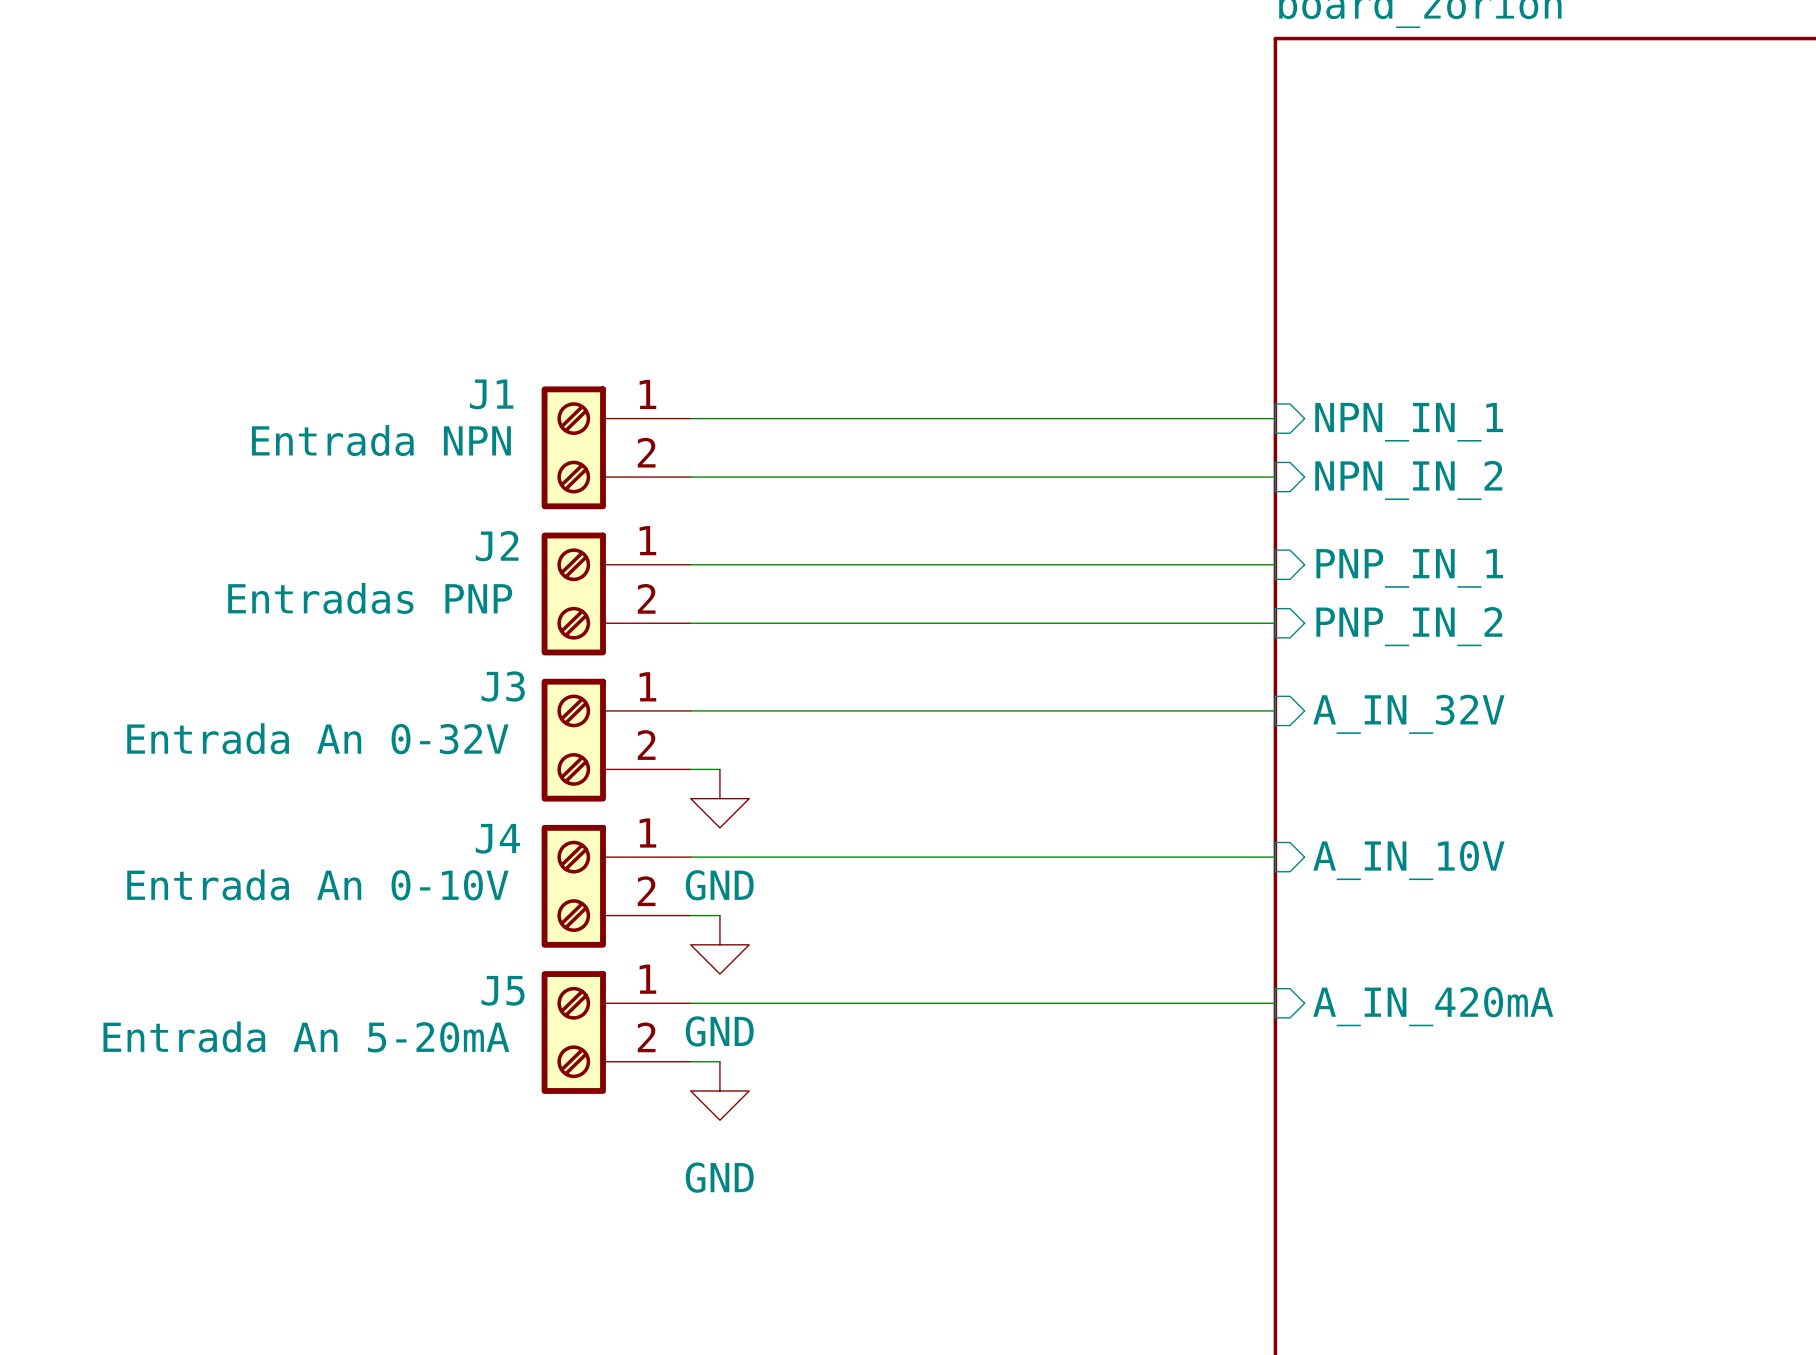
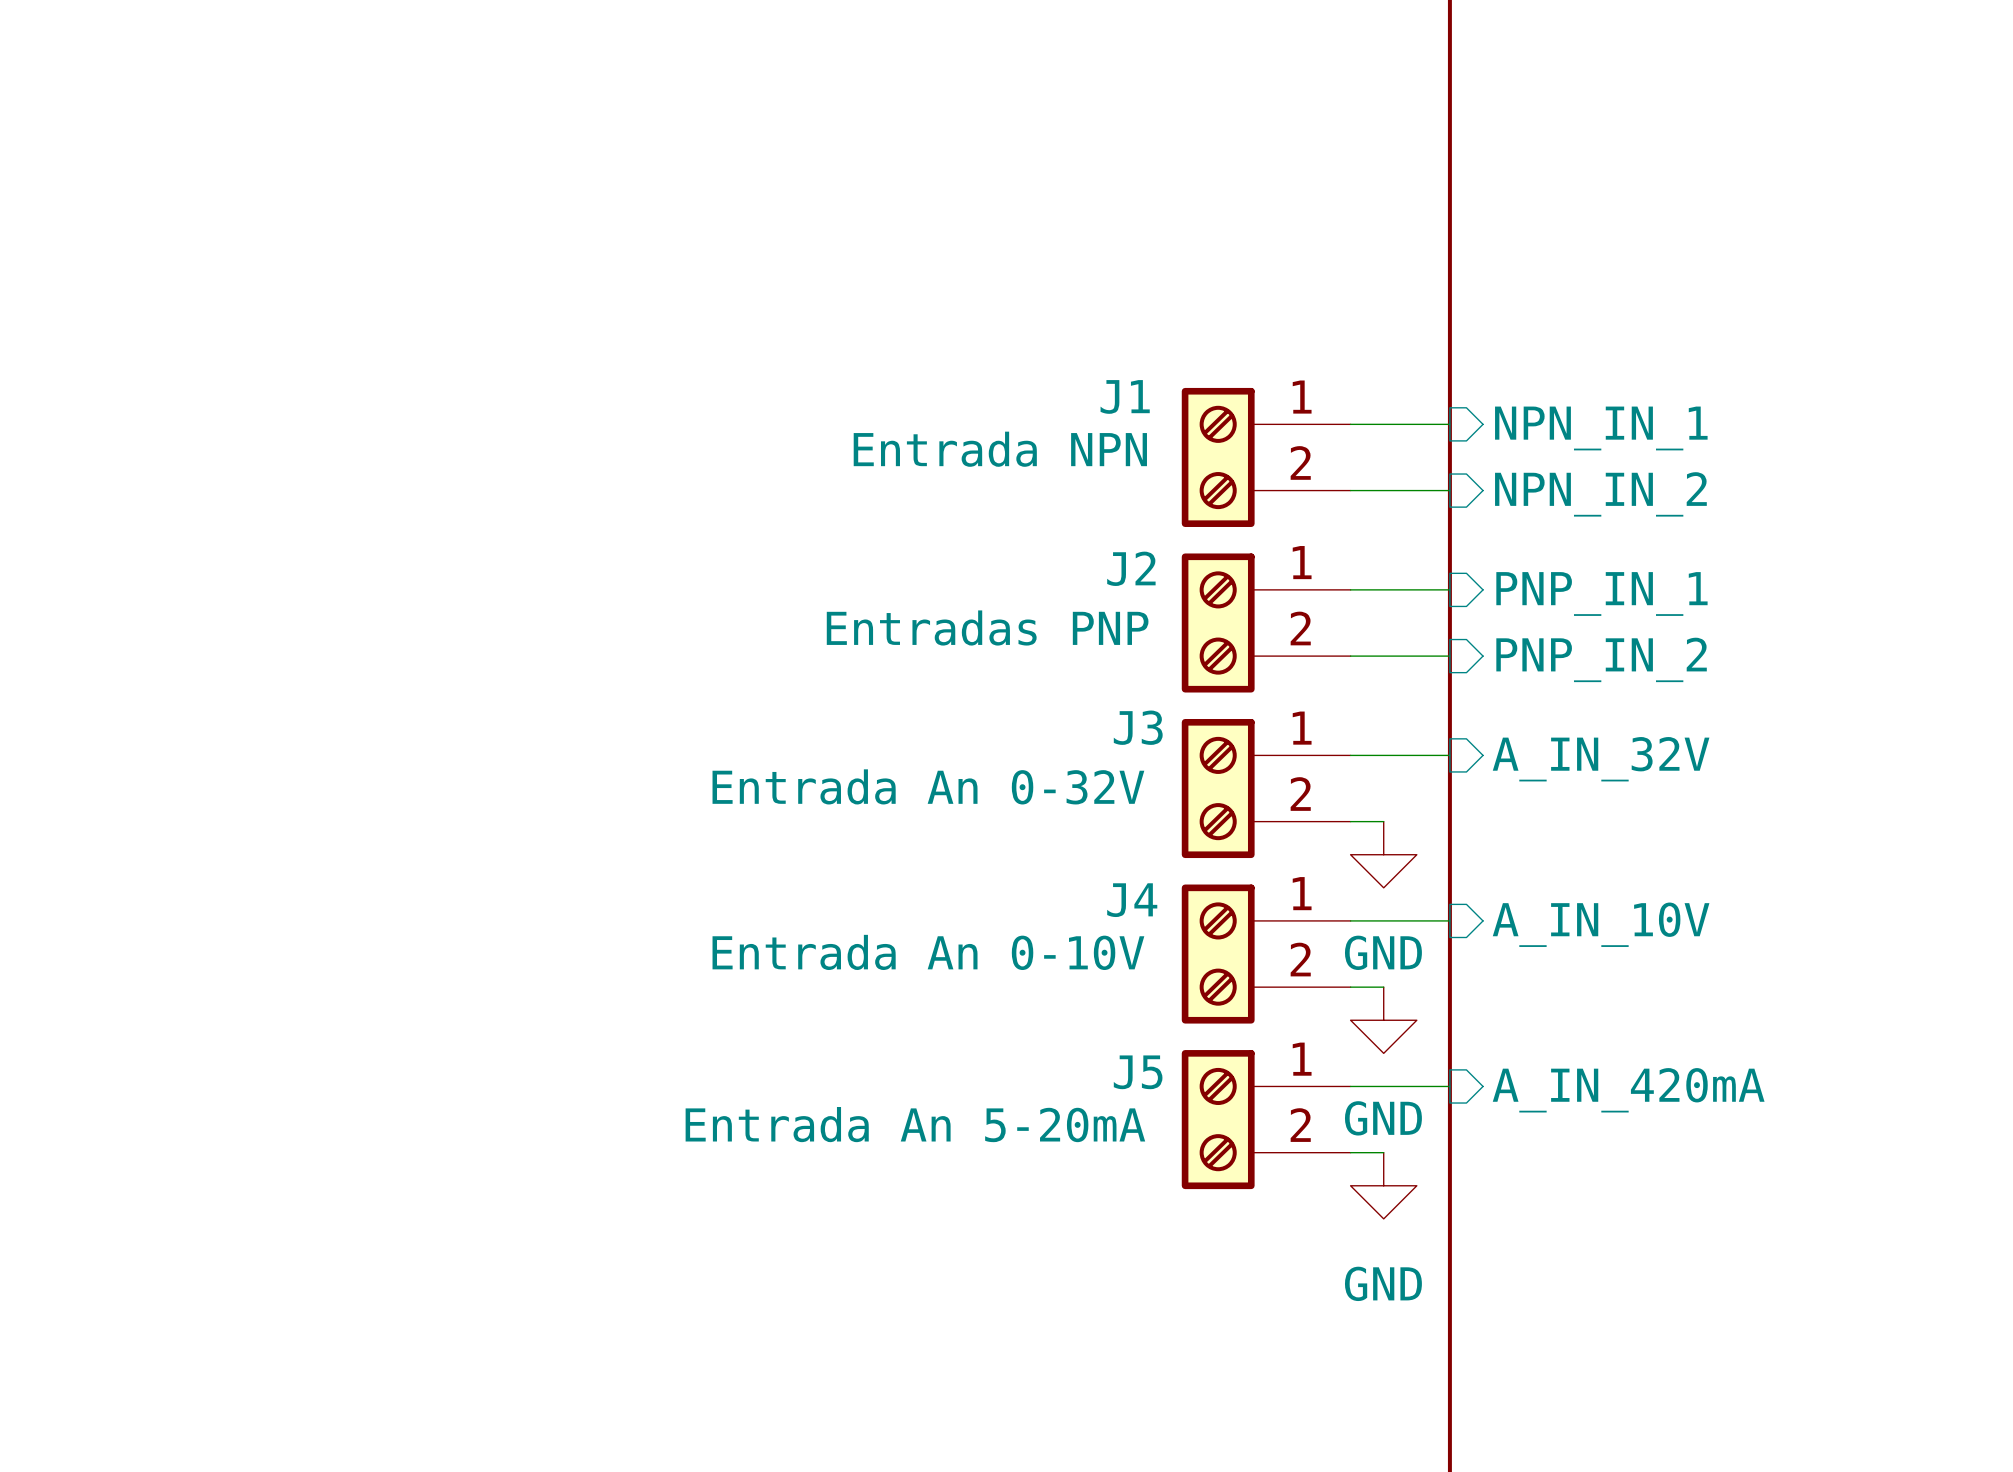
wire: (690, 418) (1187, 418) -> none
J1 position: (616, 447) -> (1266, 457)
wire: (690, 477) (1187, 477) -> none
wire: (690, 564) (1187, 564) -> none
J2 position: (616, 594) -> (1266, 622)
wire: (690, 623) (1187, 623) -> none
wire: (690, 710) (1187, 710) -> none
J3 position: (616, 740) -> (1266, 788)
wire: (690, 769) (719, 769) -> (1350, 821) (1383, 821)
power symbol: GND (719, 798) -> none
power symbol: none -> GND (1383, 854)
wire: (690, 857) (1187, 857) -> none
J4 position: (616, 886) -> (1266, 954)
wire: (690, 915) (719, 915) -> (1350, 987) (1383, 987)
power symbol: GND (719, 944) -> none
power symbol: none -> GND (1383, 1020)
wire: (690, 1003) (1187, 1003) -> none
J5 position: (616, 1032) -> (1266, 1119)
wire: (690, 1061) (719, 1061) -> (1350, 1152) (1383, 1152)
power symbol: GND (719, 1090) -> none
power symbol: none -> GND (1383, 1185)

